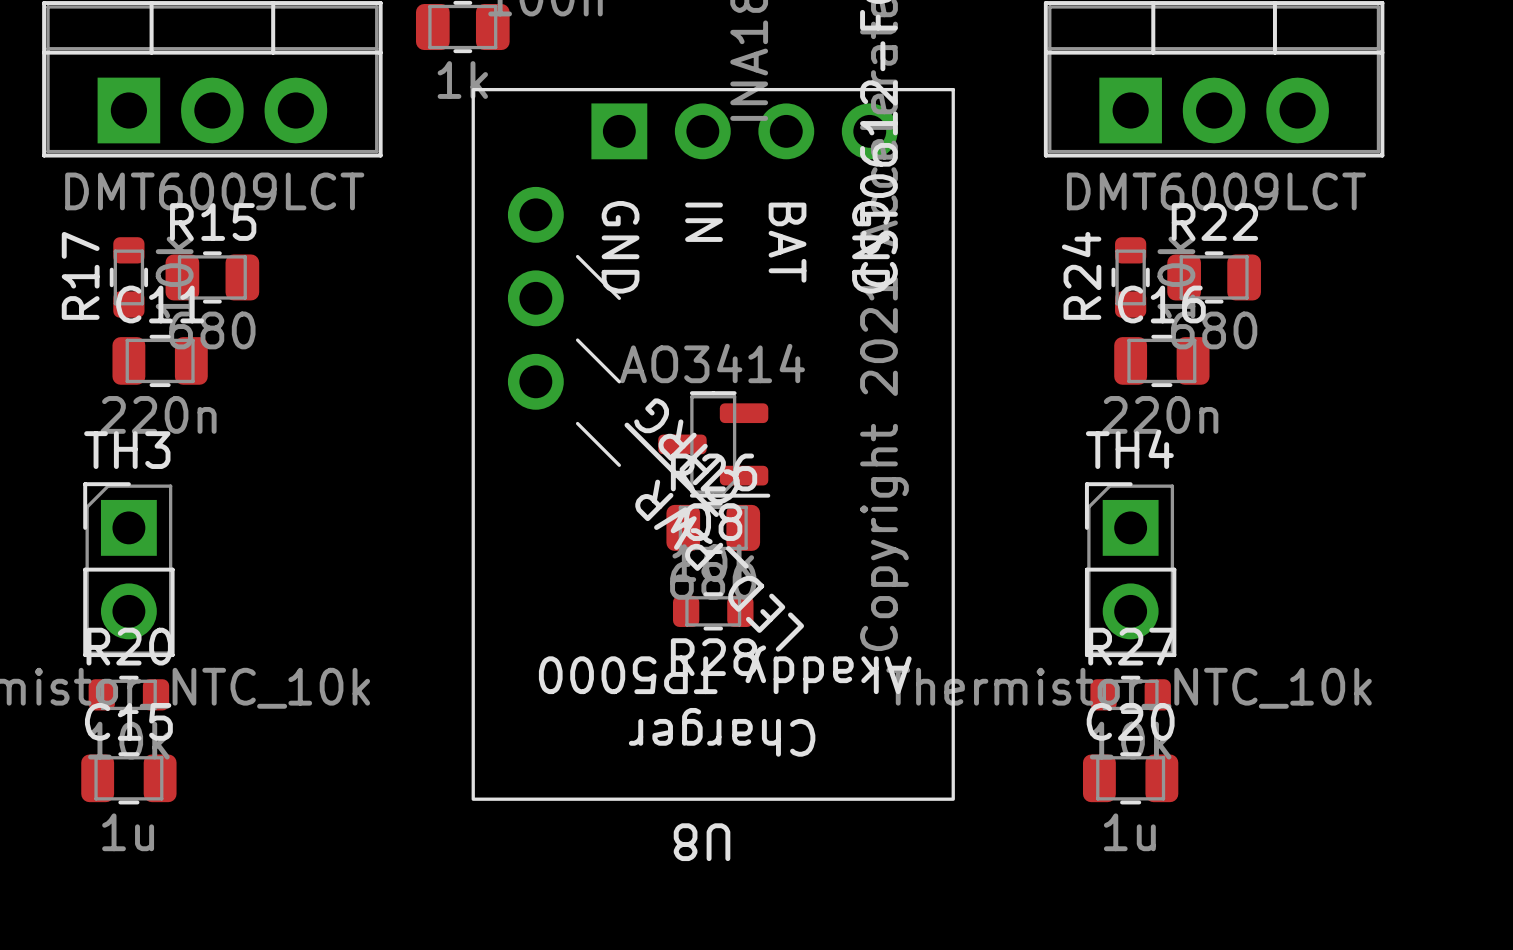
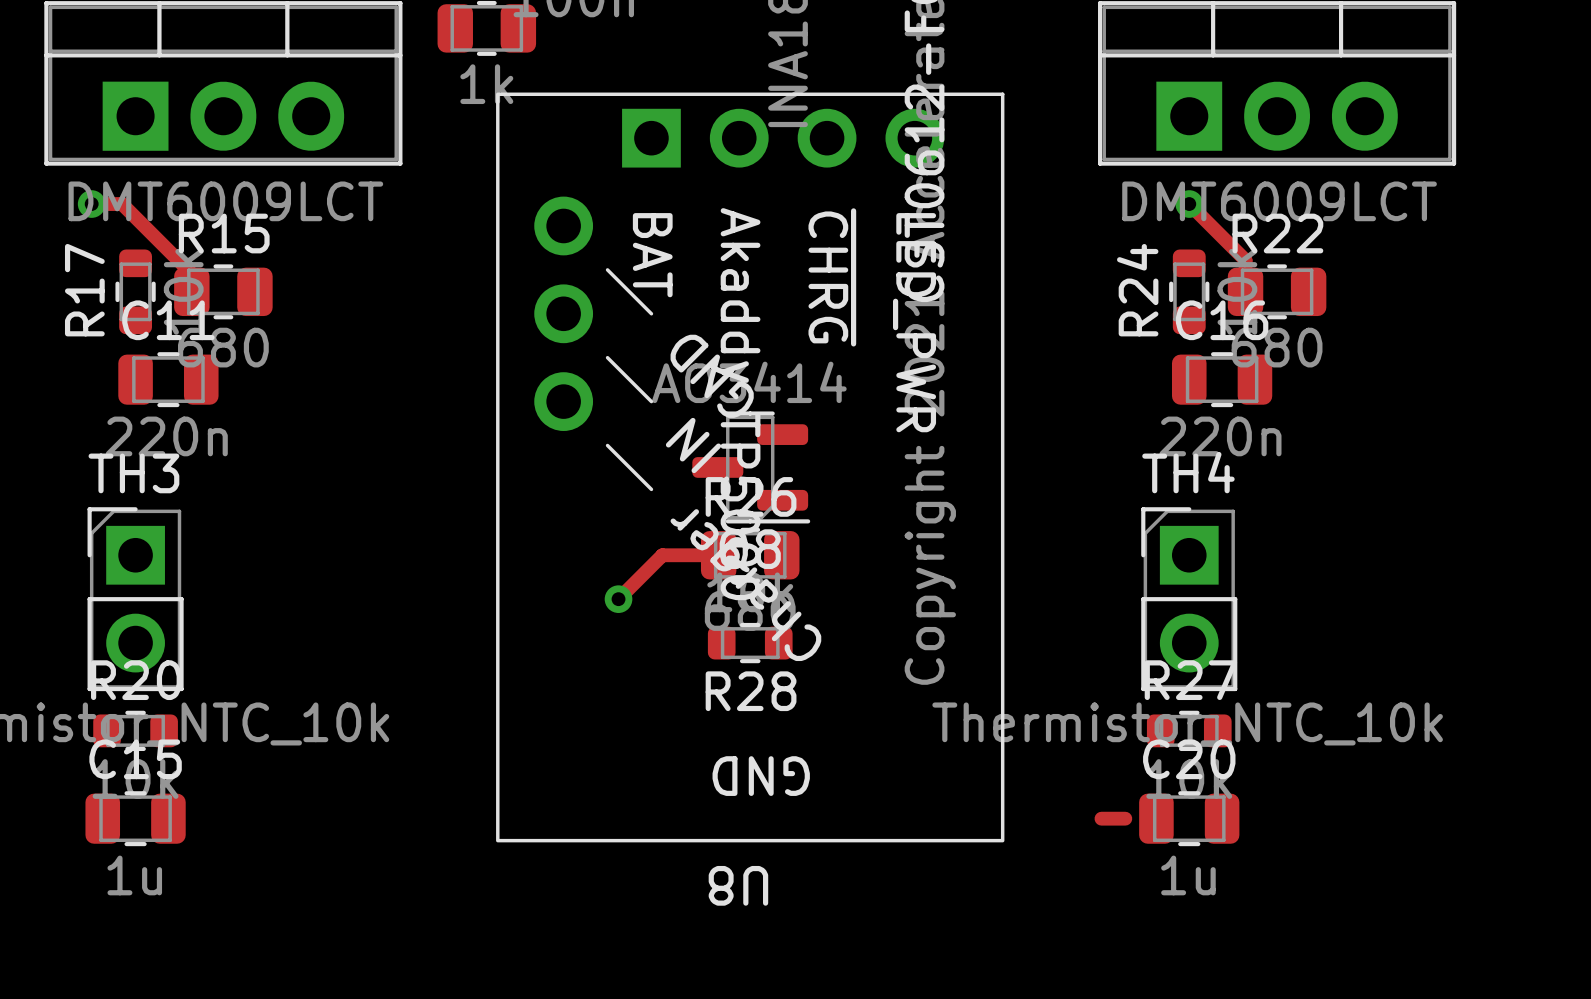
U8 footprint: [471, 87, 955, 801] -> [496, 92, 1005, 843]
track: none -> (91, 204) (122, 204) (191, 273) (191, 291)
via: none -> (91, 204)
track: none -> (1189, 204) (1245, 260) (1245, 291)
via: none -> (1189, 204)
track: none -> (718, 555) (662, 555) (618, 599)
via: none -> (618, 599)
track: none -> (1101, 818) (1125, 818)

